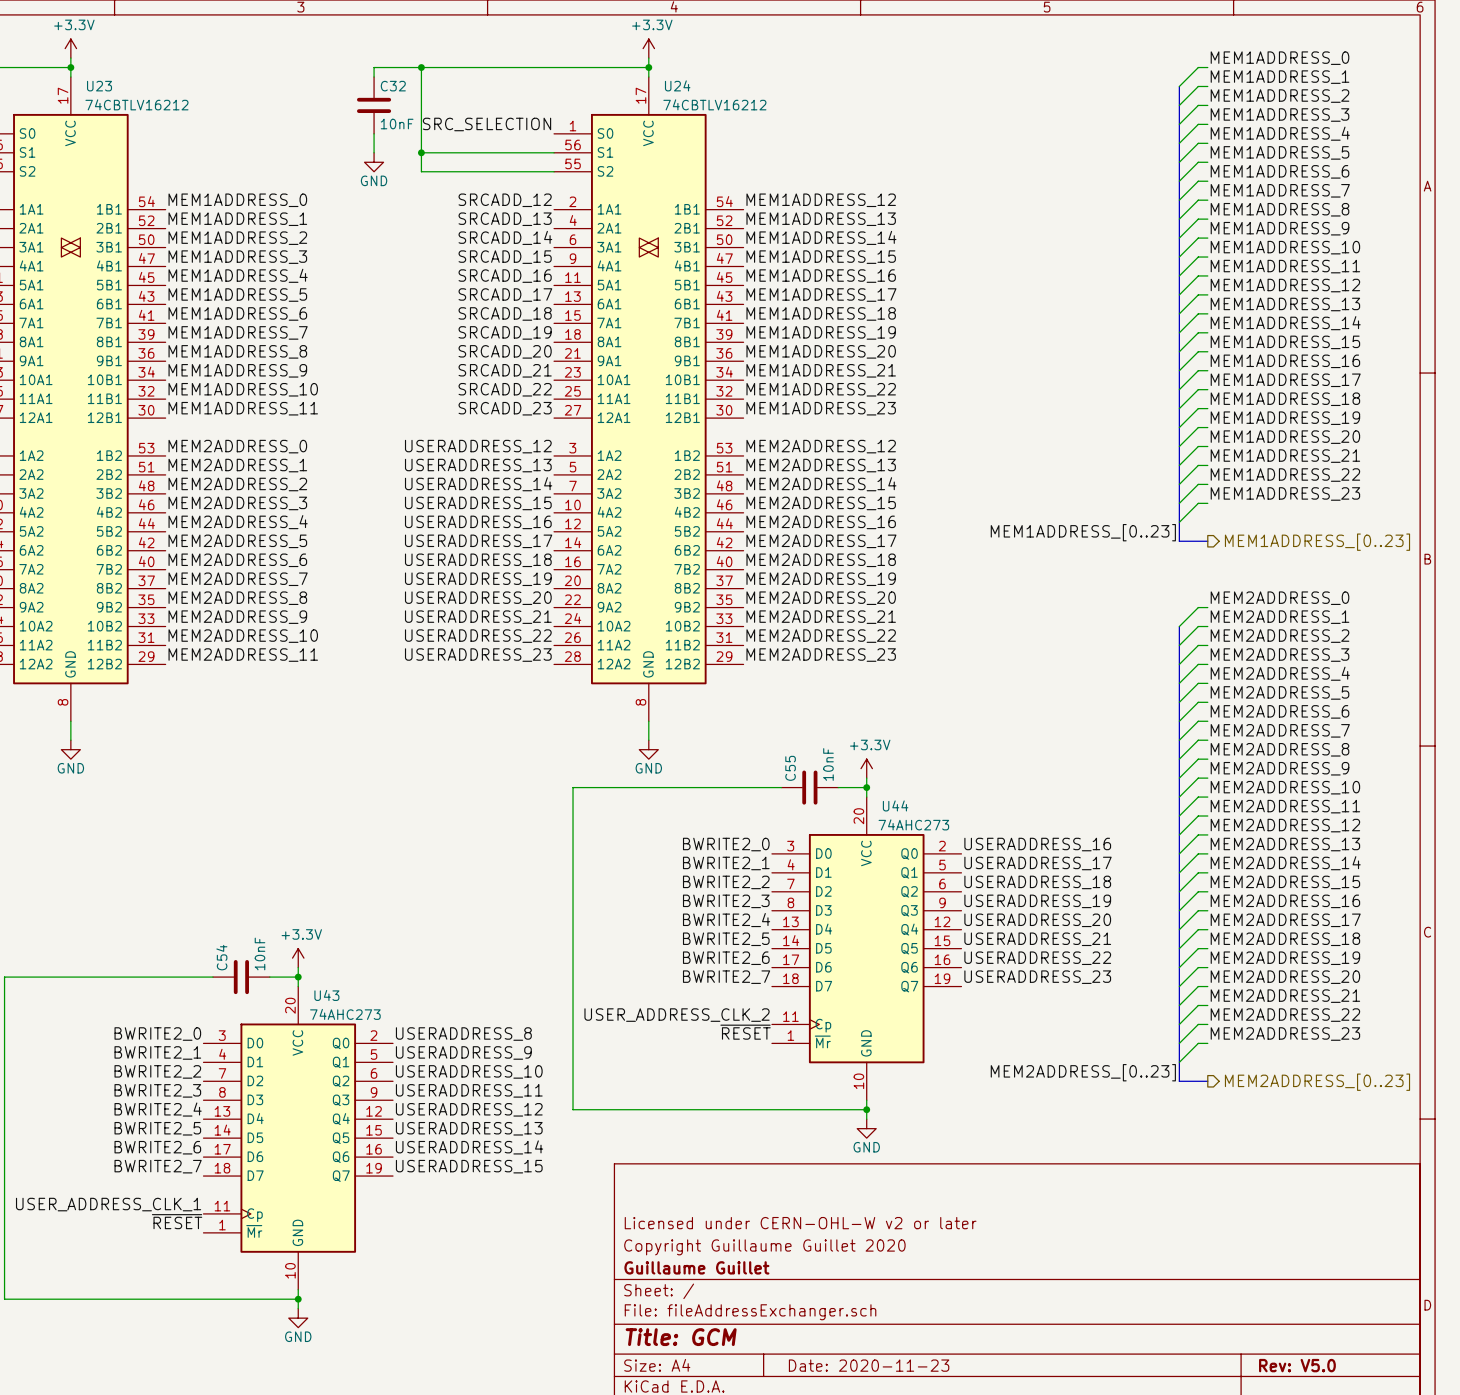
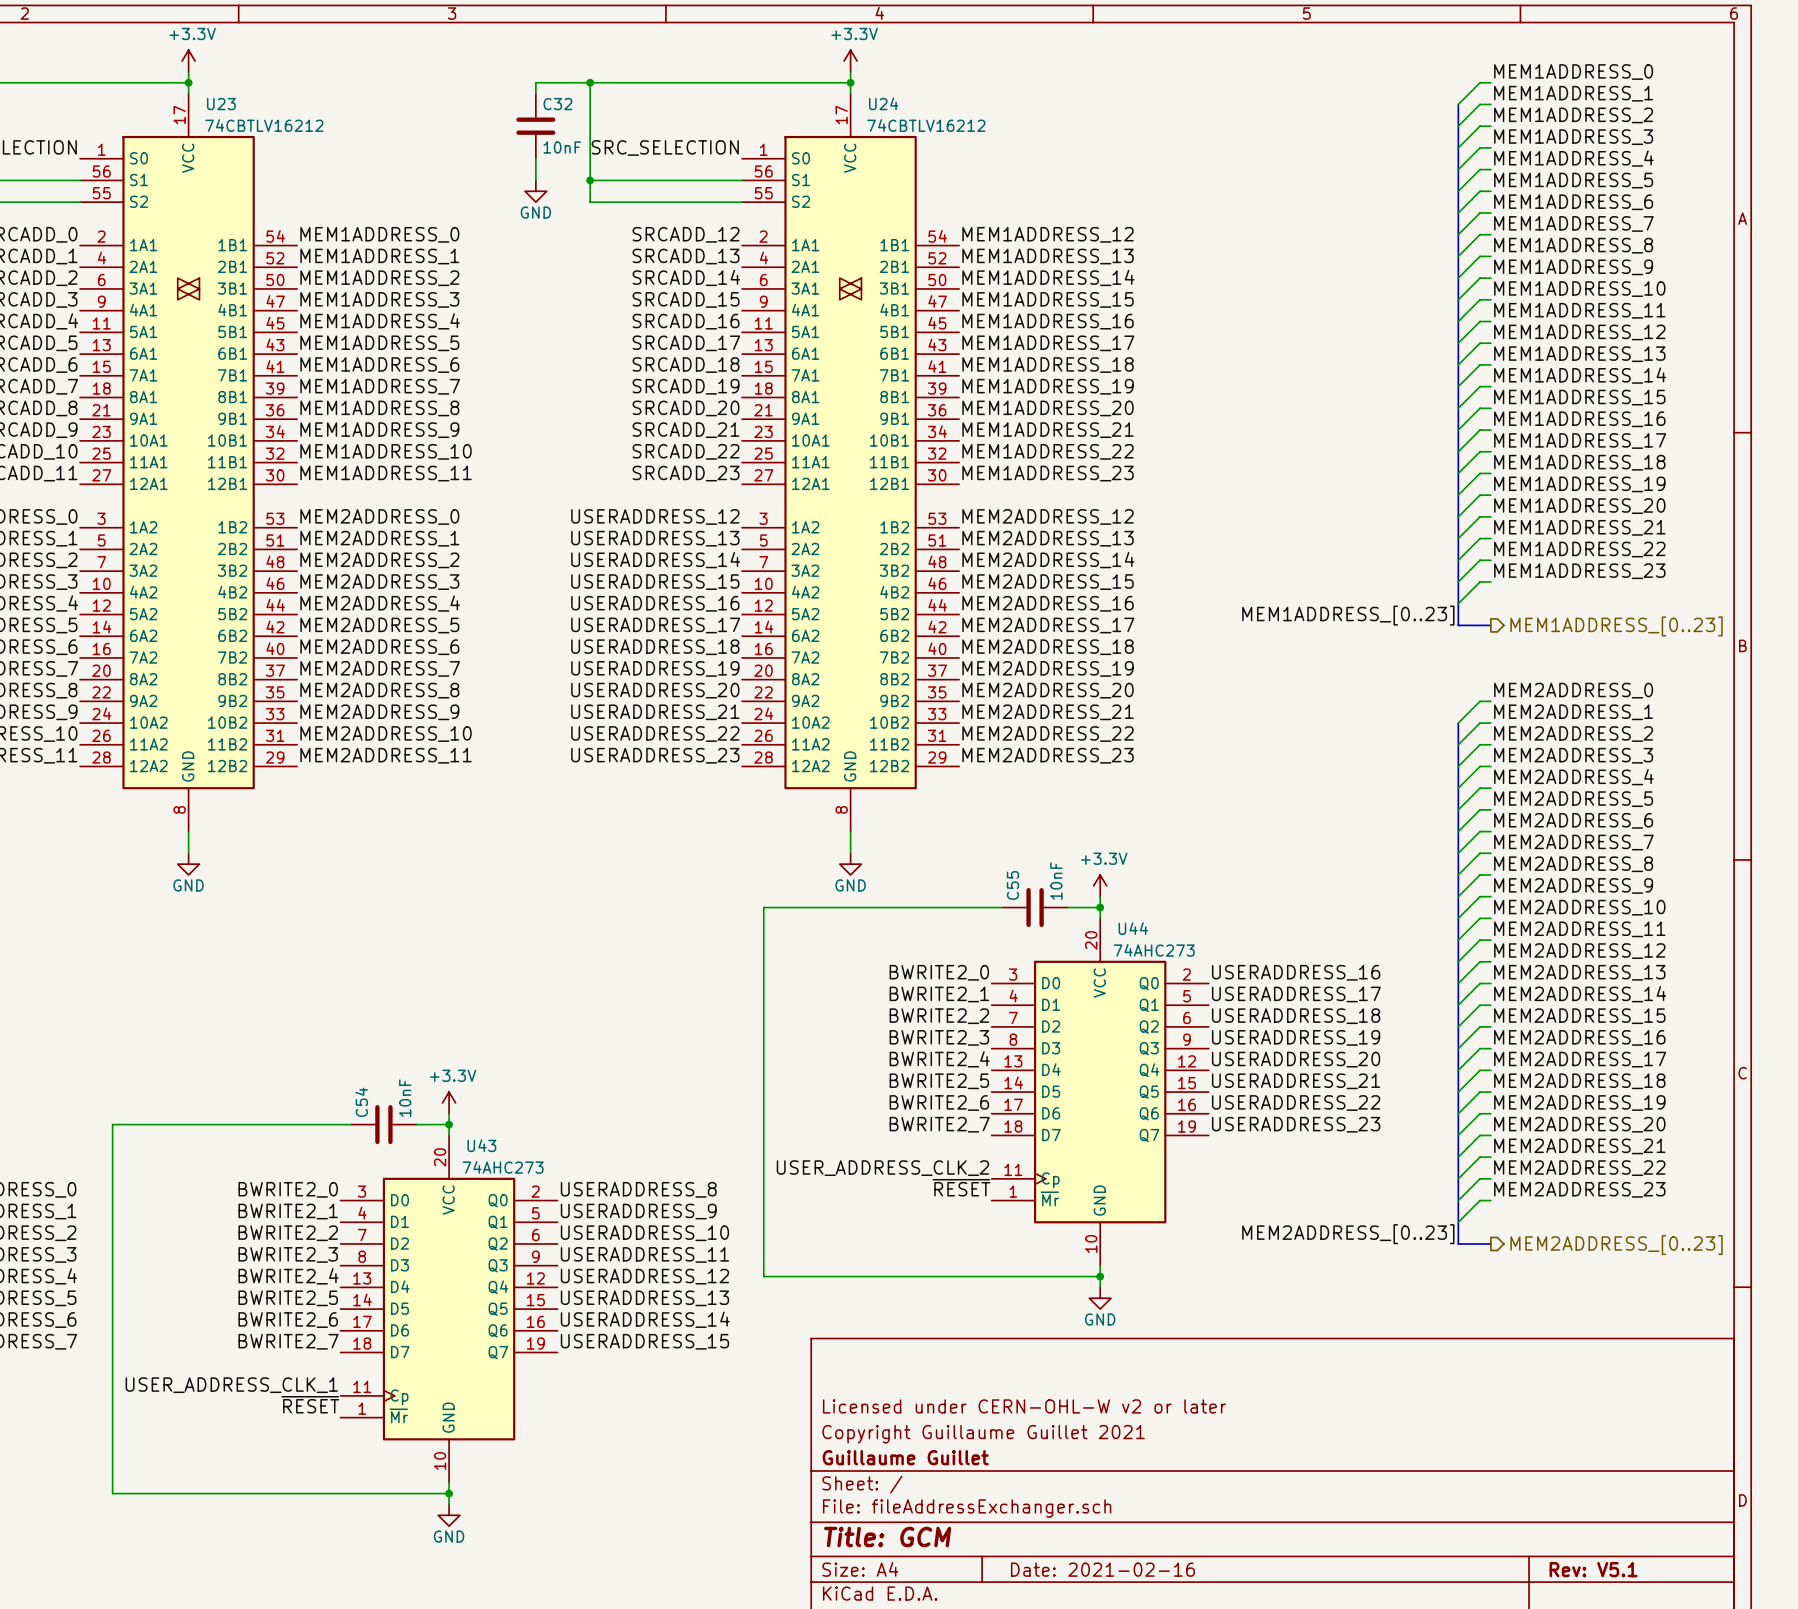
title block: Copyright Guillaume Guillet 2020 (764, 1247) -> Copyright Guillaume Guillet 2021 (983, 1434)
title block: Date: 2020-11-23 (869, 1365) -> Date: 2021-02-16 (1102, 1569)
title block: Rev: V5.0 (1297, 1365) -> Rev: V5.1 (1593, 1569)

